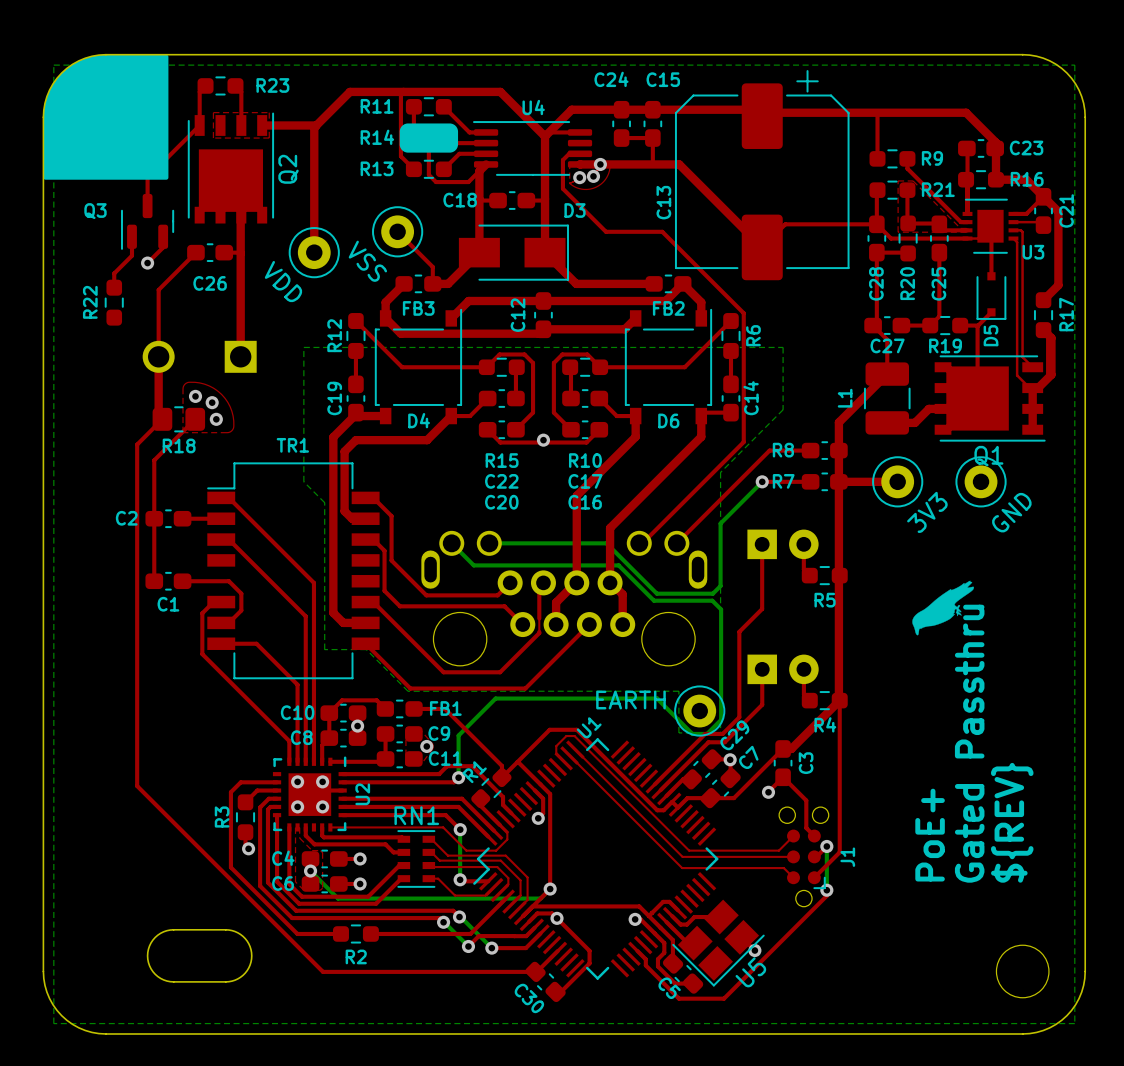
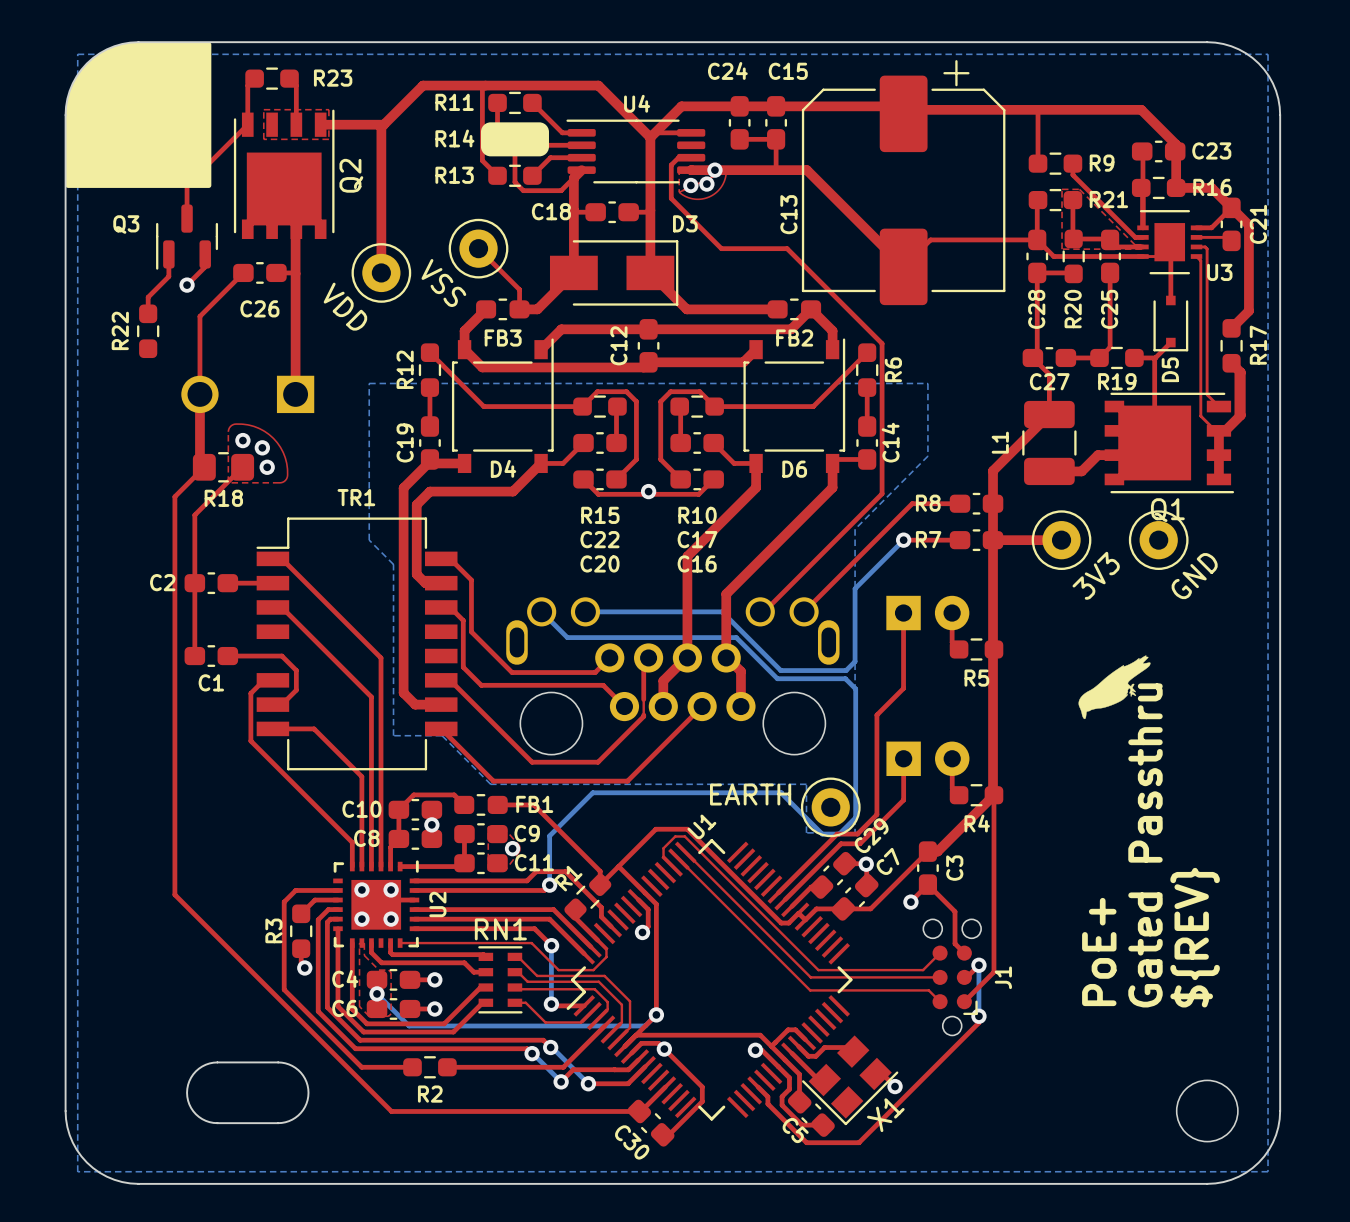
U5: (718, 943) -> none
X1: none -> (850, 1080)

